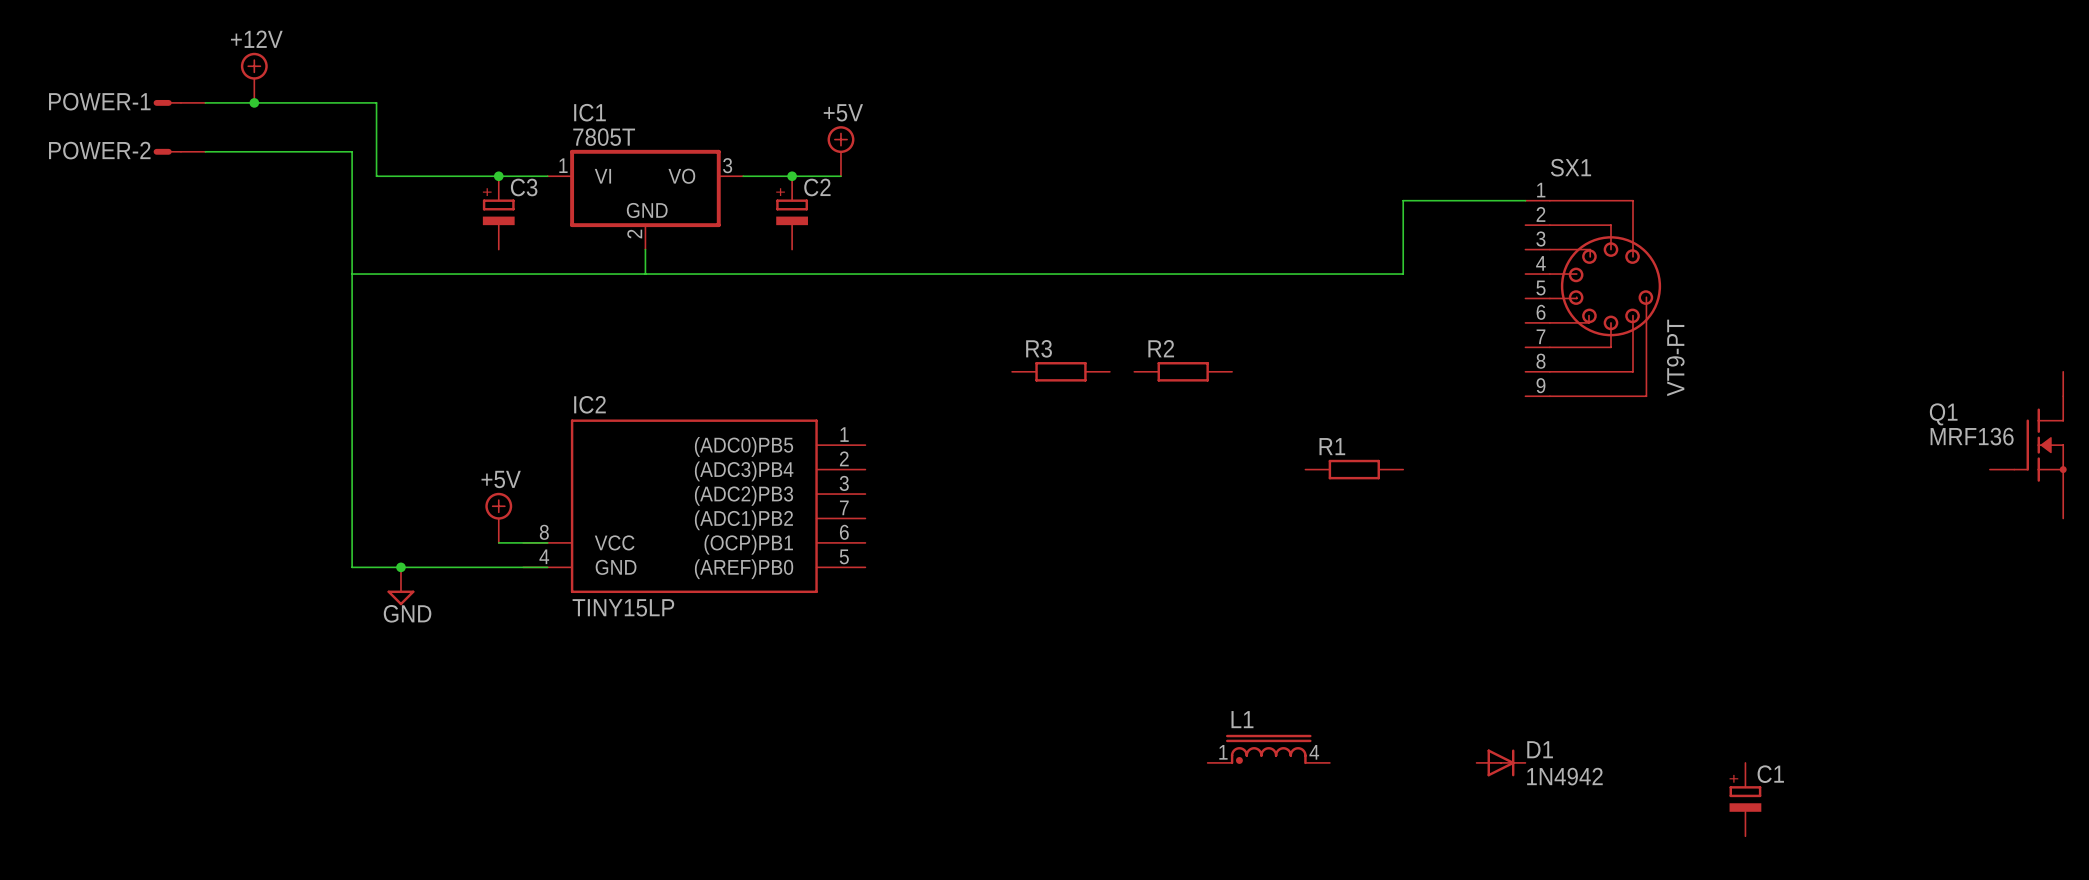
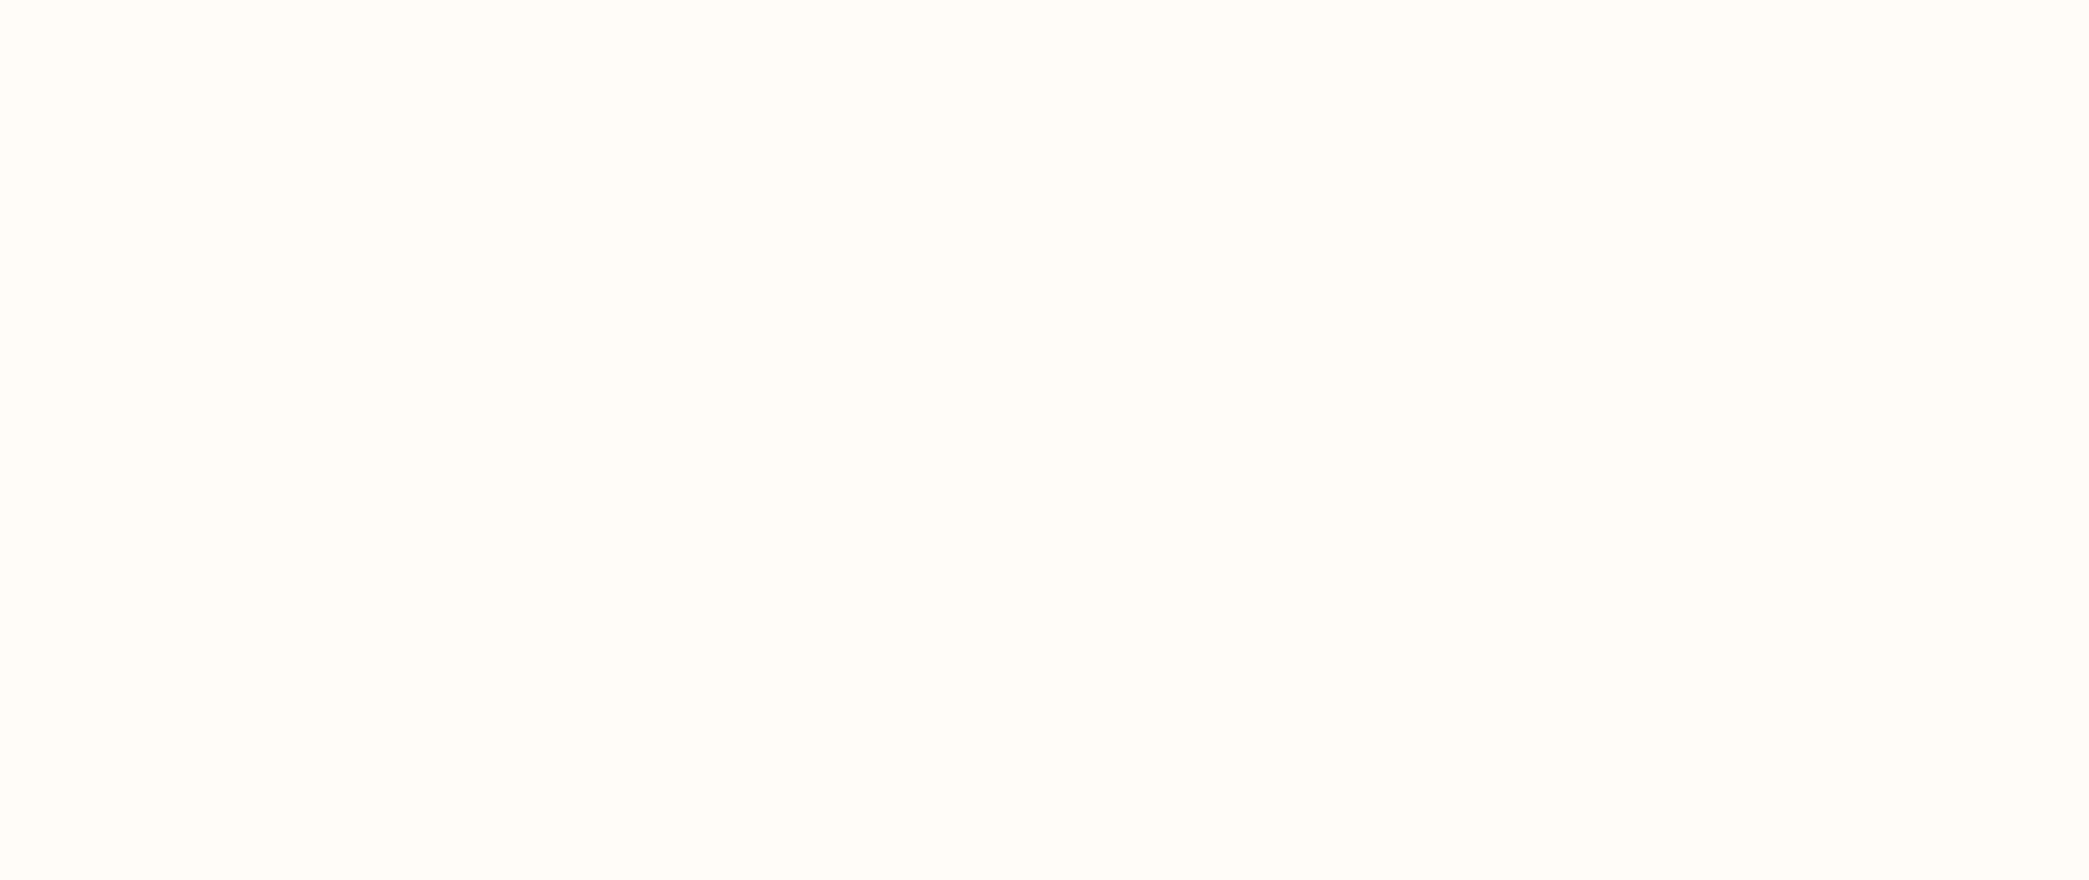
power symbol: +12V (254, 77) -> none
POWER-1: (179, 102) -> none
wire: (205, 102) (376, 102) (376, 176) (547, 176) -> none
junction: (254, 102) -> none
POWER-2: (179, 151) -> none
wire: (205, 151) (352, 151) (352, 567) (547, 567) -> none
power symbol: +5V (840, 151) -> none
junction: (498, 176) -> none
wire: (743, 176) (840, 176) -> none
junction: (792, 176) -> none
IC1: 7805T (645, 199) -> none
wire: (1525, 200) (1403, 200) (1403, 274) (352, 274) -> none
C3: (498, 212) -> none
C2: (792, 212) -> none
wire: (645, 249) (645, 274) -> none
SX1: VT9-PT (1593, 298) -> none
R3: (1060, 371) -> none
R2: (1183, 371) -> none
Q1: MRF136 (2028, 445) -> none
R1: (1354, 469) -> none
IC2: TINY15LP (694, 506) -> none
power symbol: +5V (498, 517) -> none
wire: (498, 542) (547, 542) -> none
junction: (400, 567) -> none
power symbol: GND (400, 586) -> none
L1: (1268, 749) -> none
D1: 1N4942 (1500, 762) -> none
C1: (1745, 799) -> none

